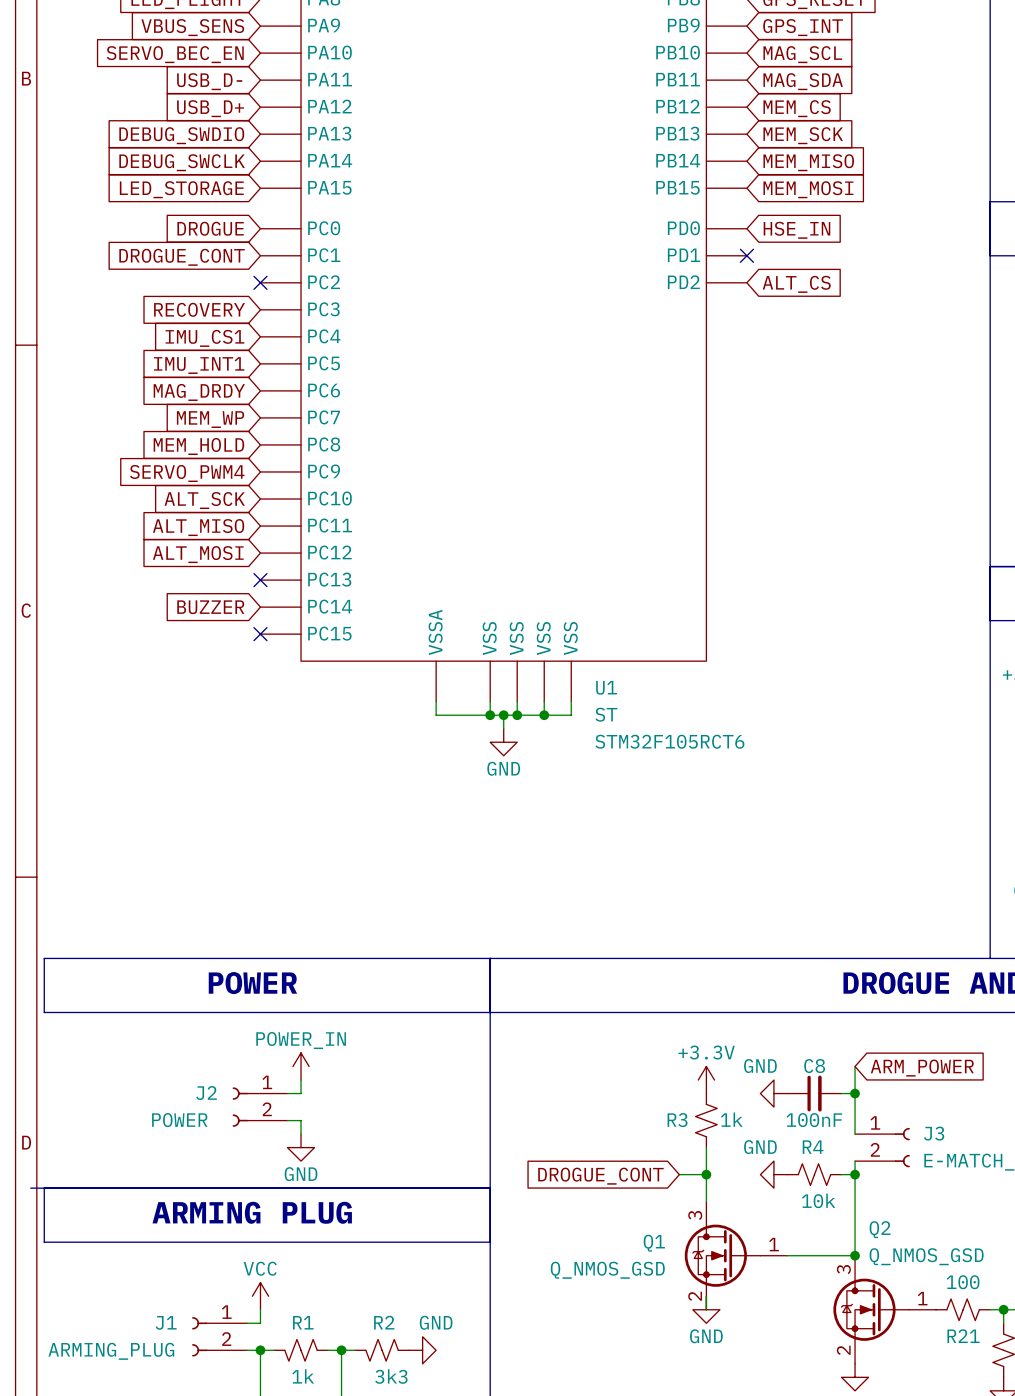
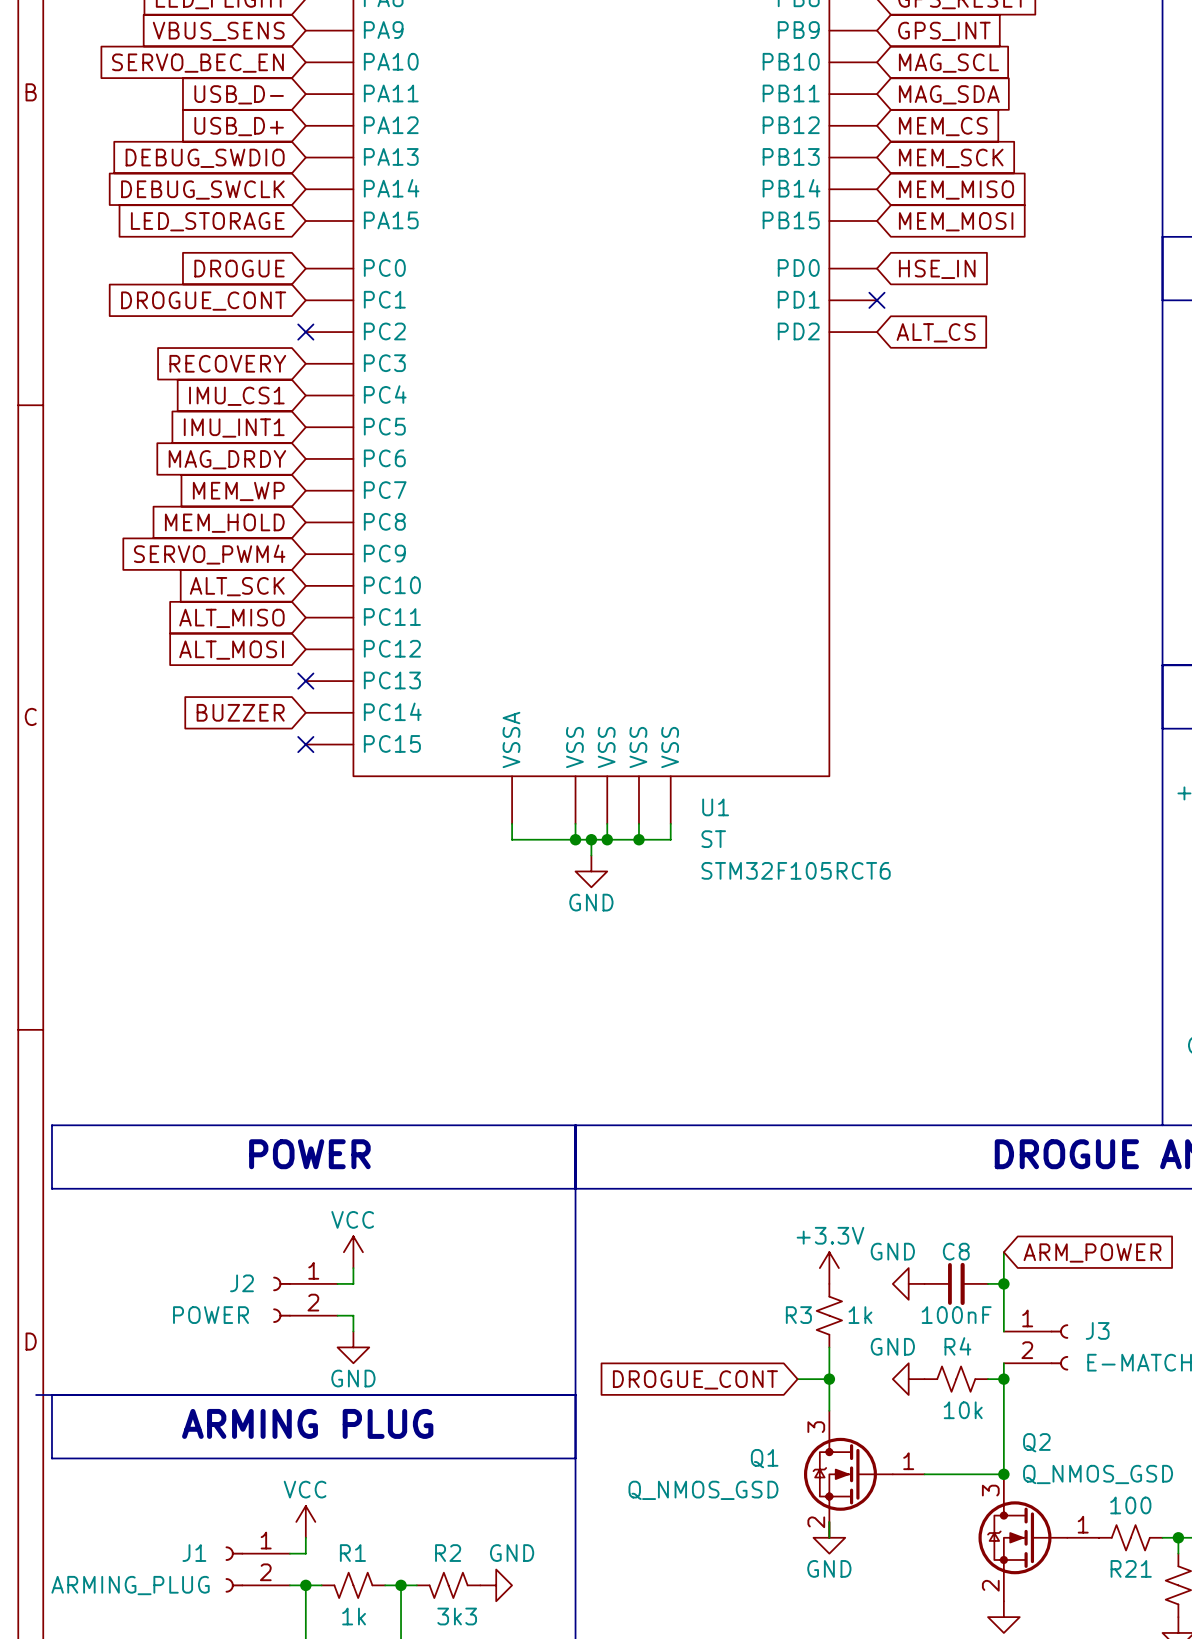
power symbol: POWER_IN (301, 1066) -> VCC (353, 1252)

